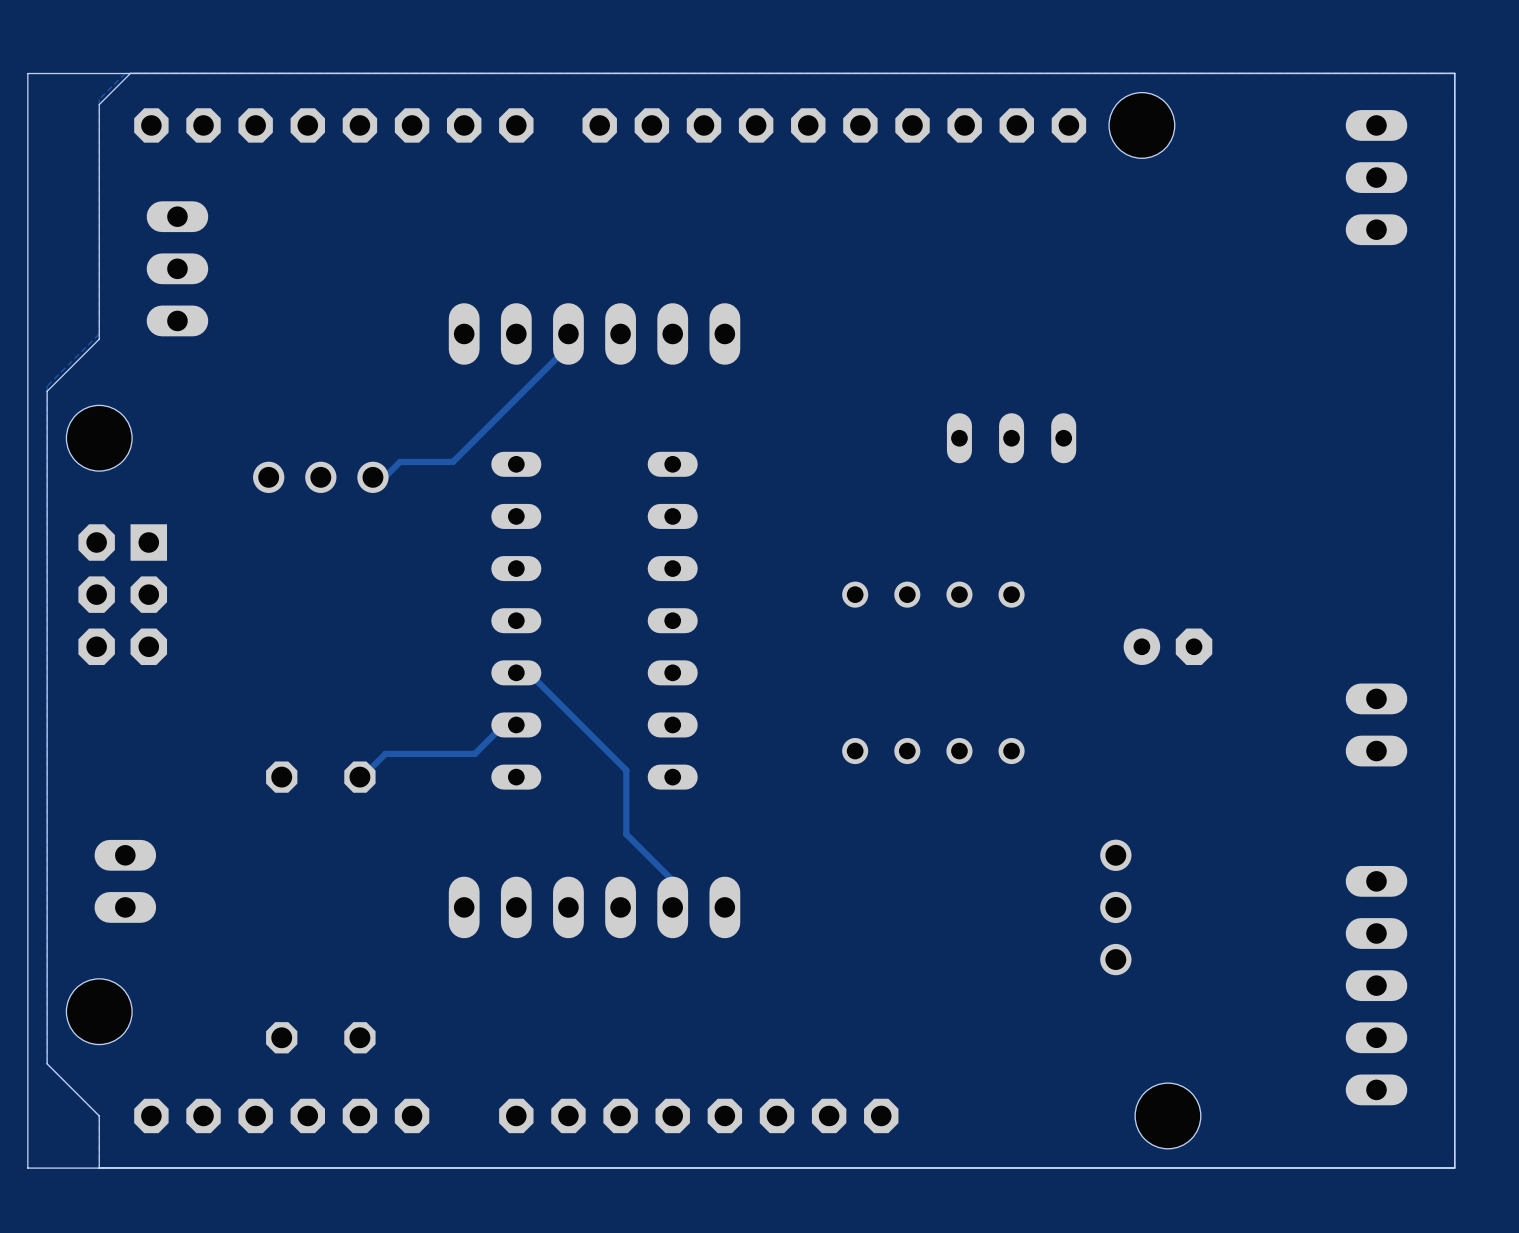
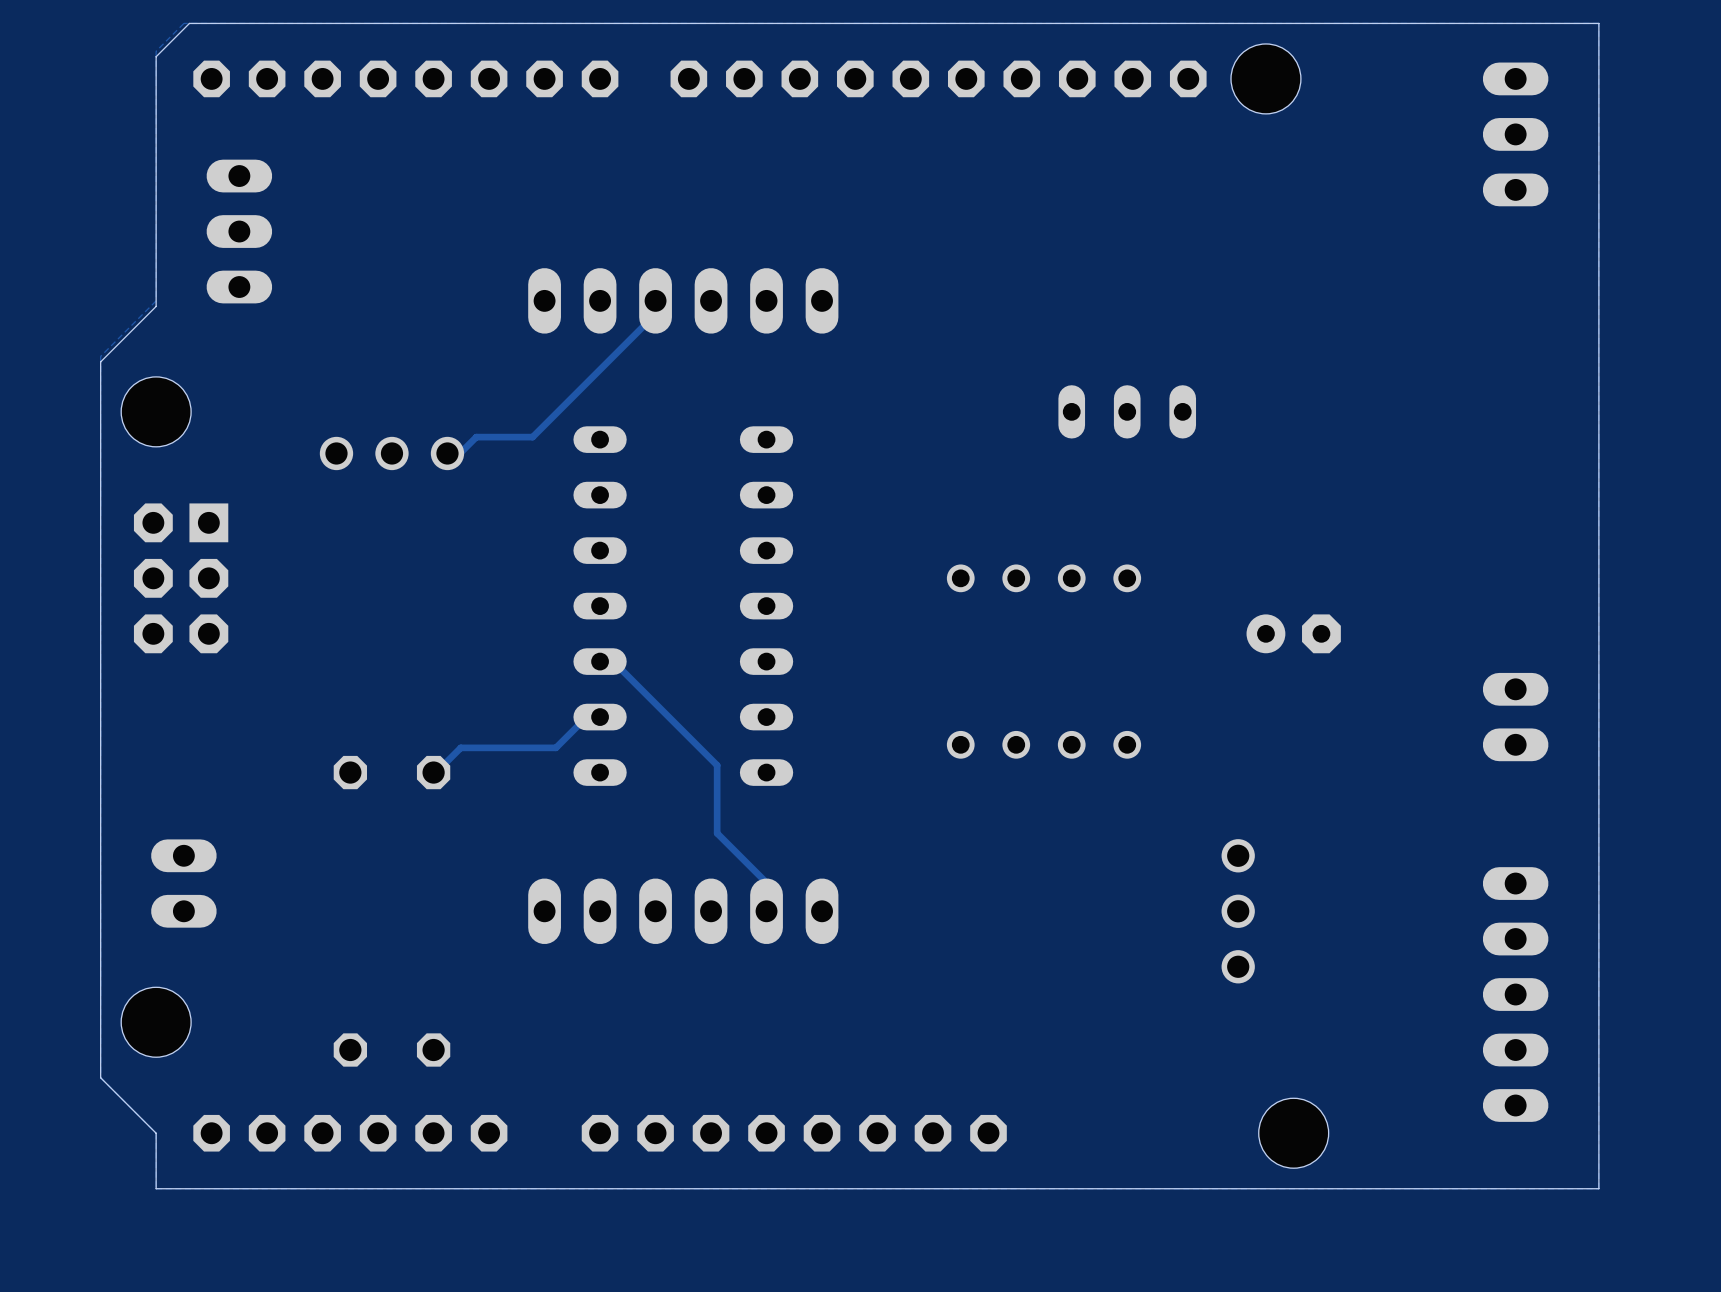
board edge: (1454, 73) (27, 73) (27, 1168) (1454, 1168) (1454, 73) -> none

